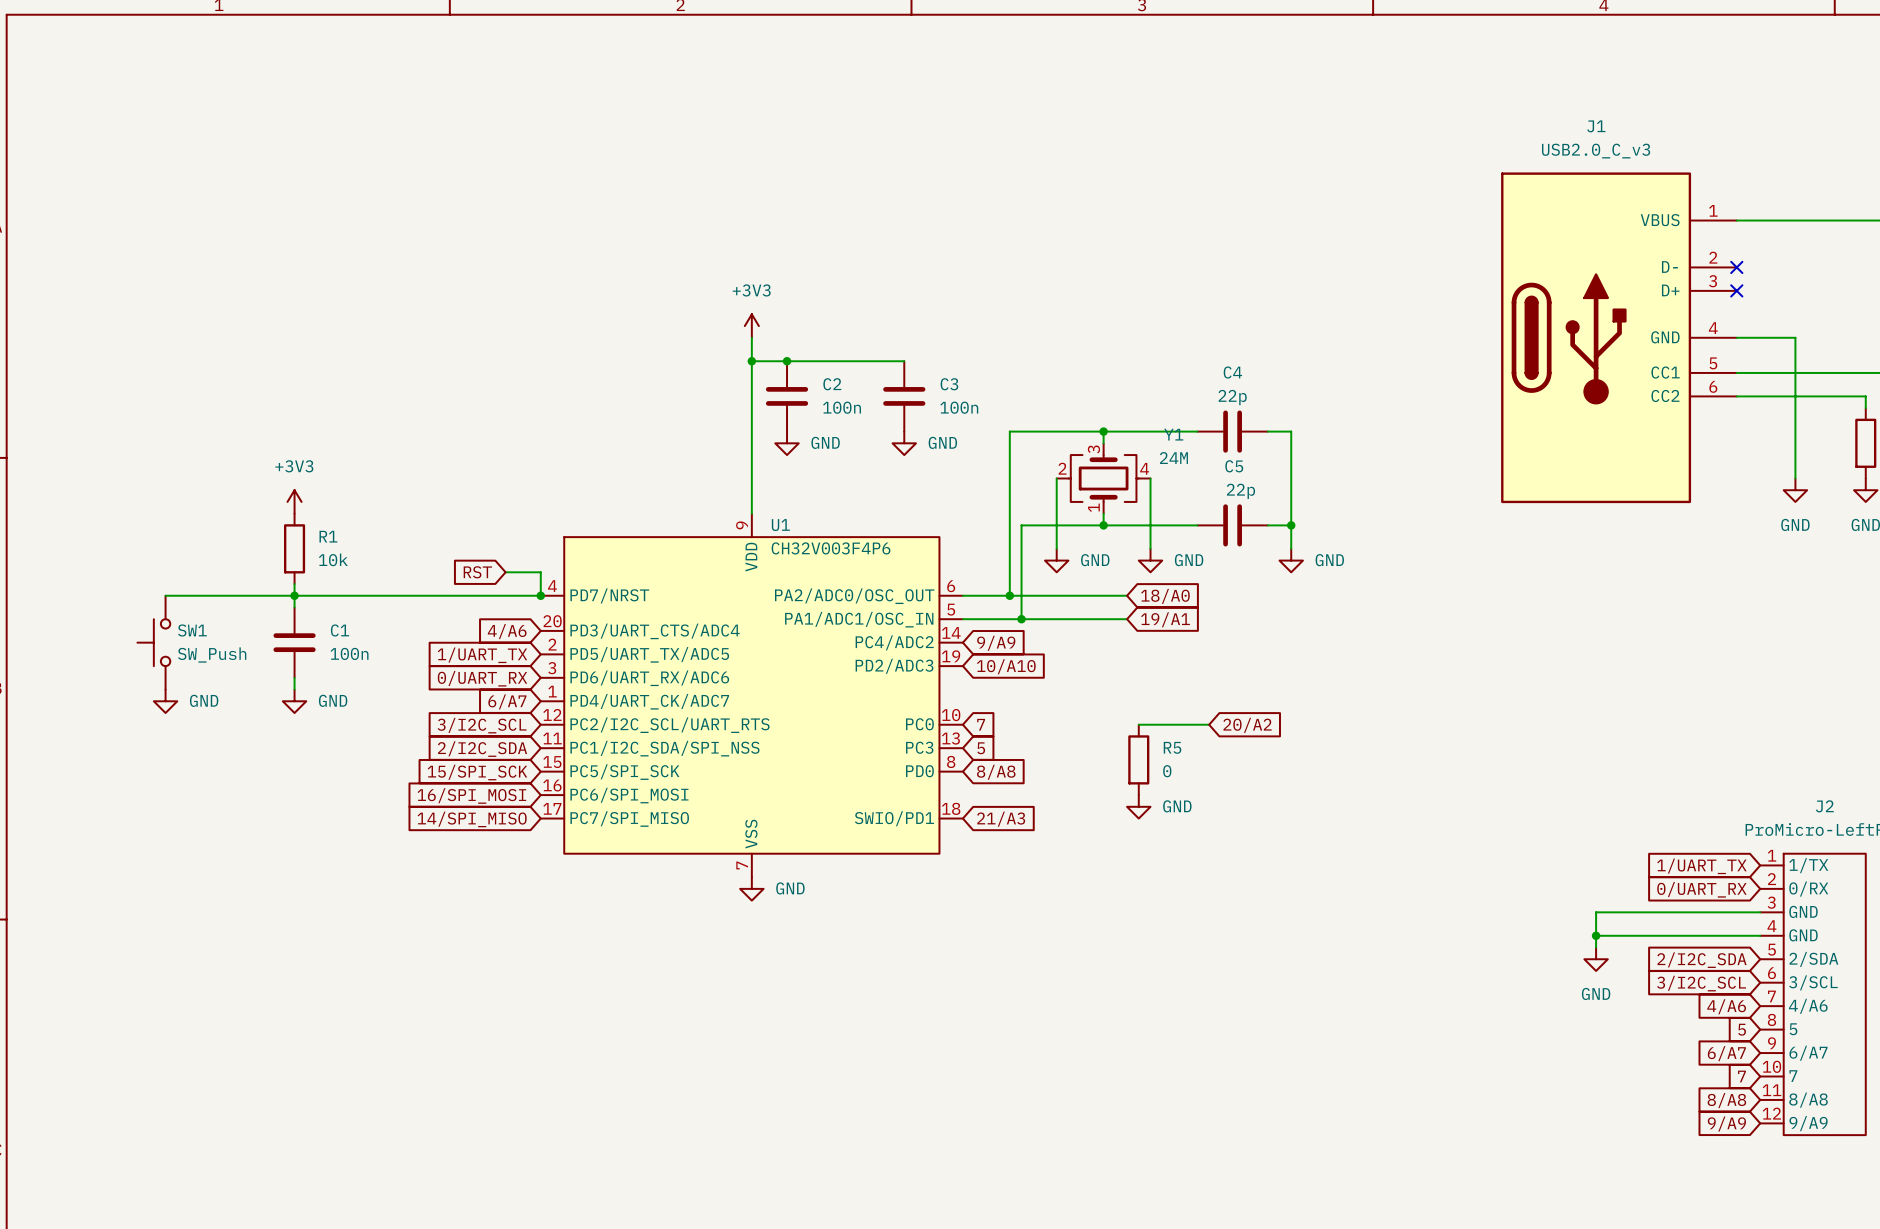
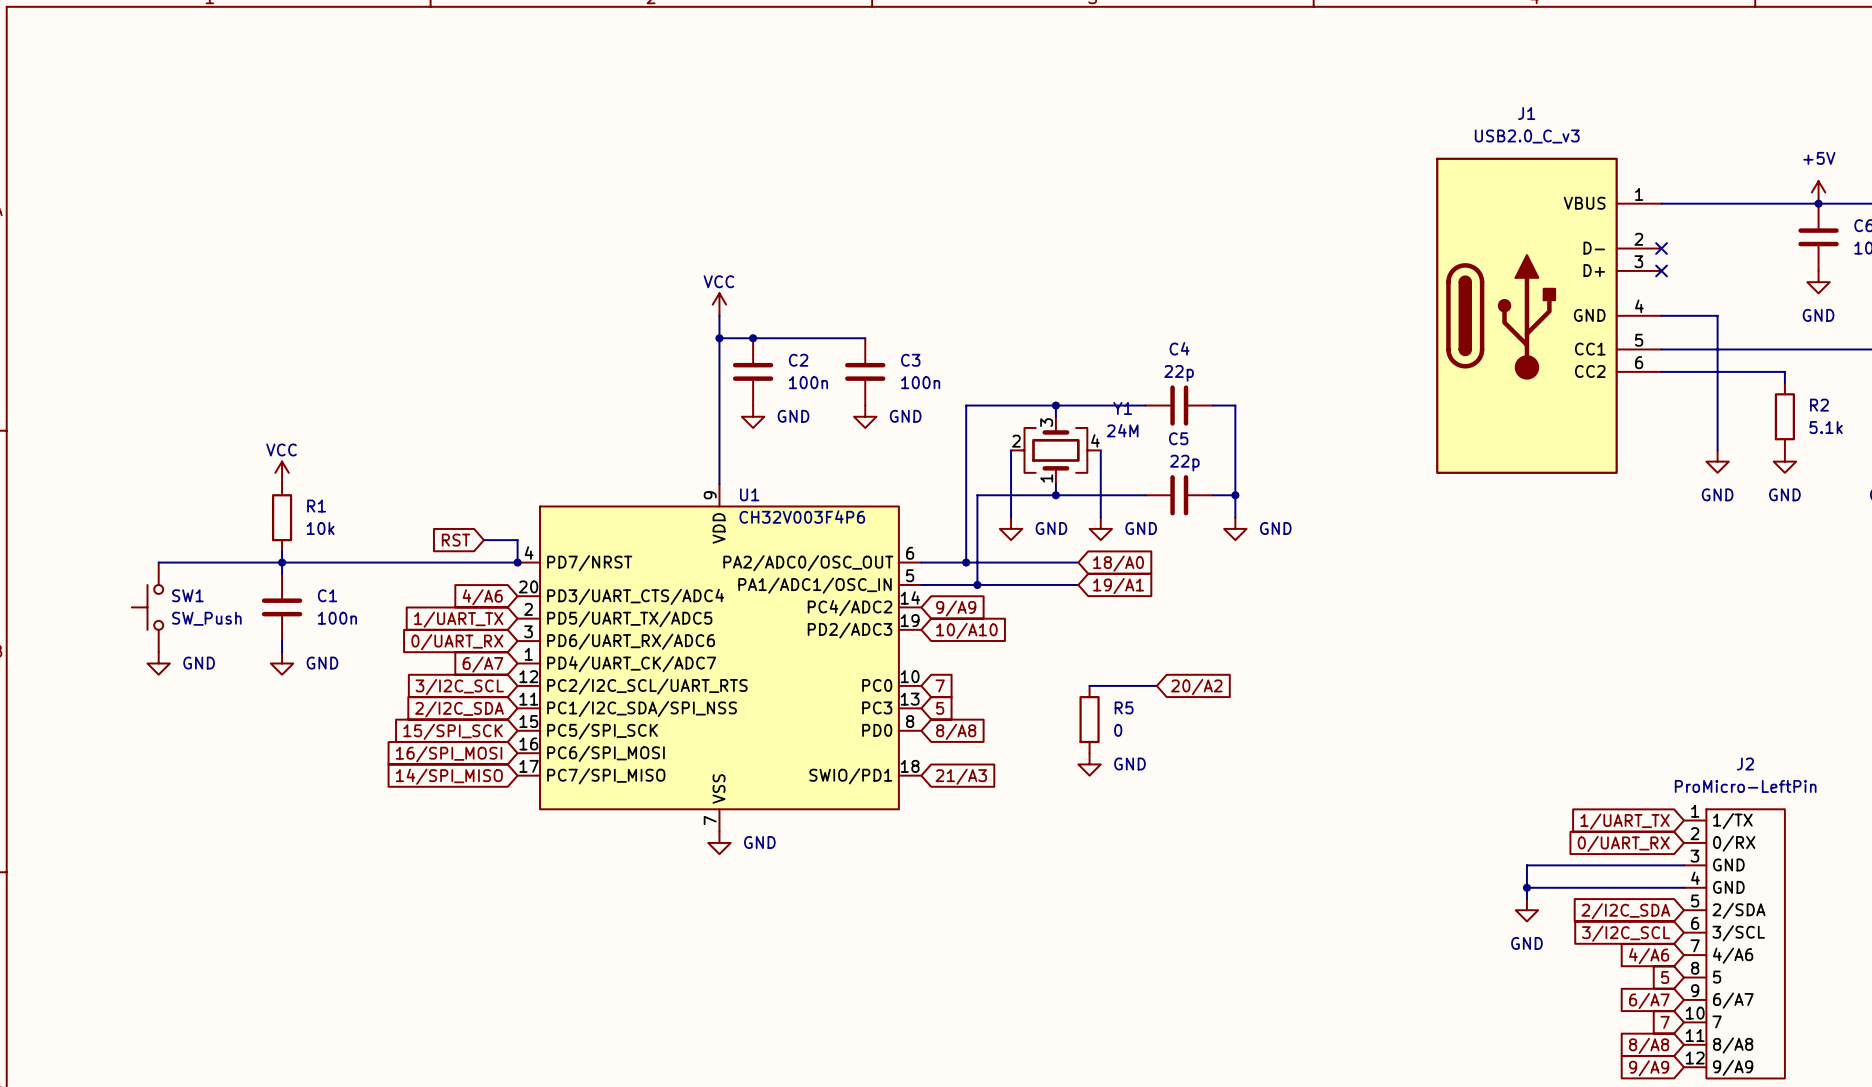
power symbol: +3V3 (751, 326) -> VCC (719, 304)
power symbol: +3V3 (294, 501) -> VCC (282, 472)

